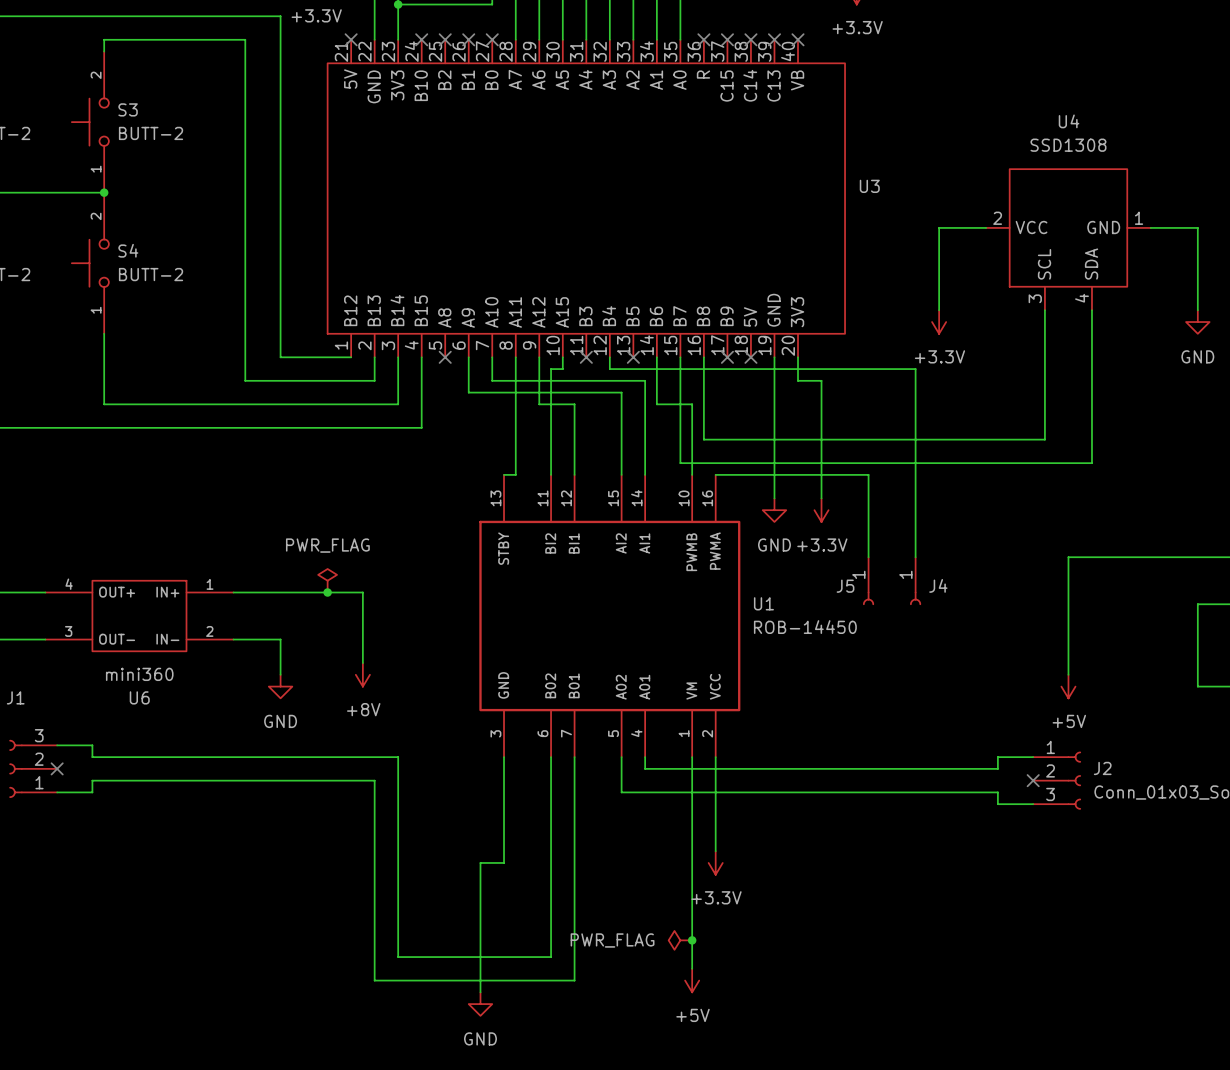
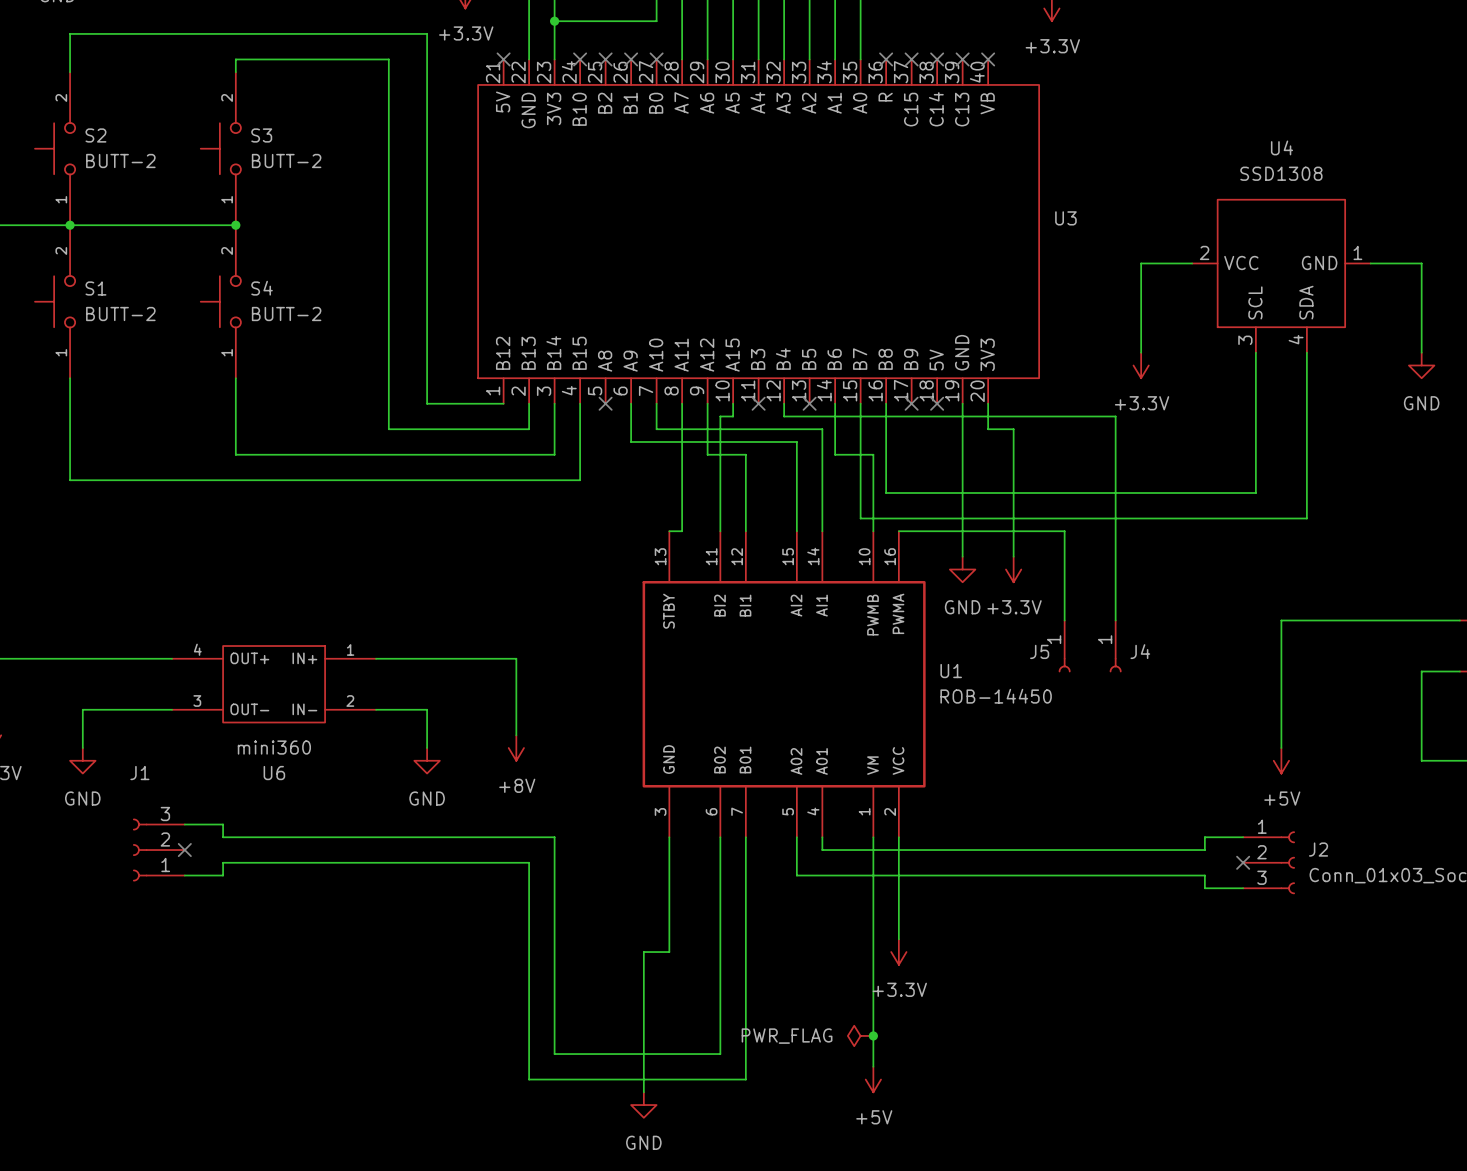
power symbol: PWR_FLAG (327, 580) -> none
junction: (327, 592) -> none

